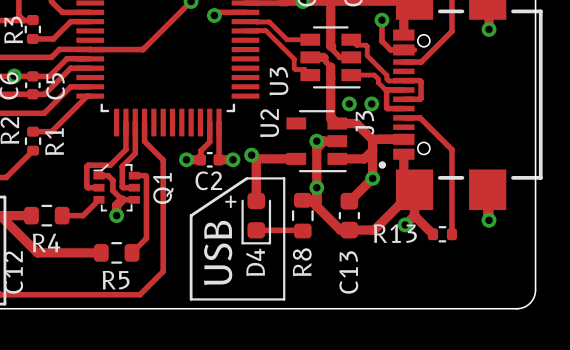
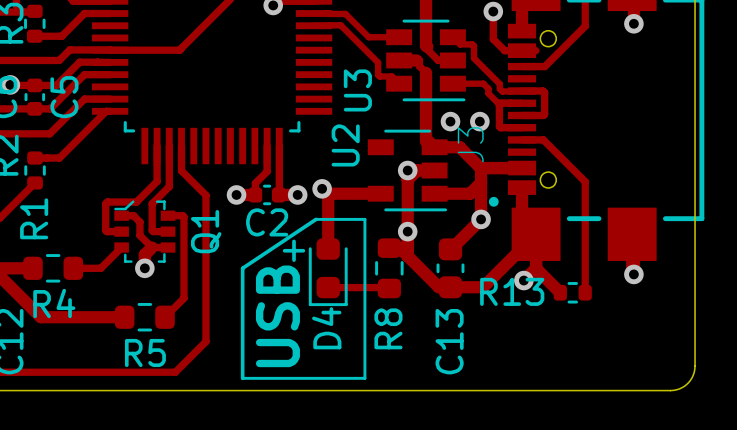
R1 name position: R1 (54, 141) -> R1 (34, 218)

